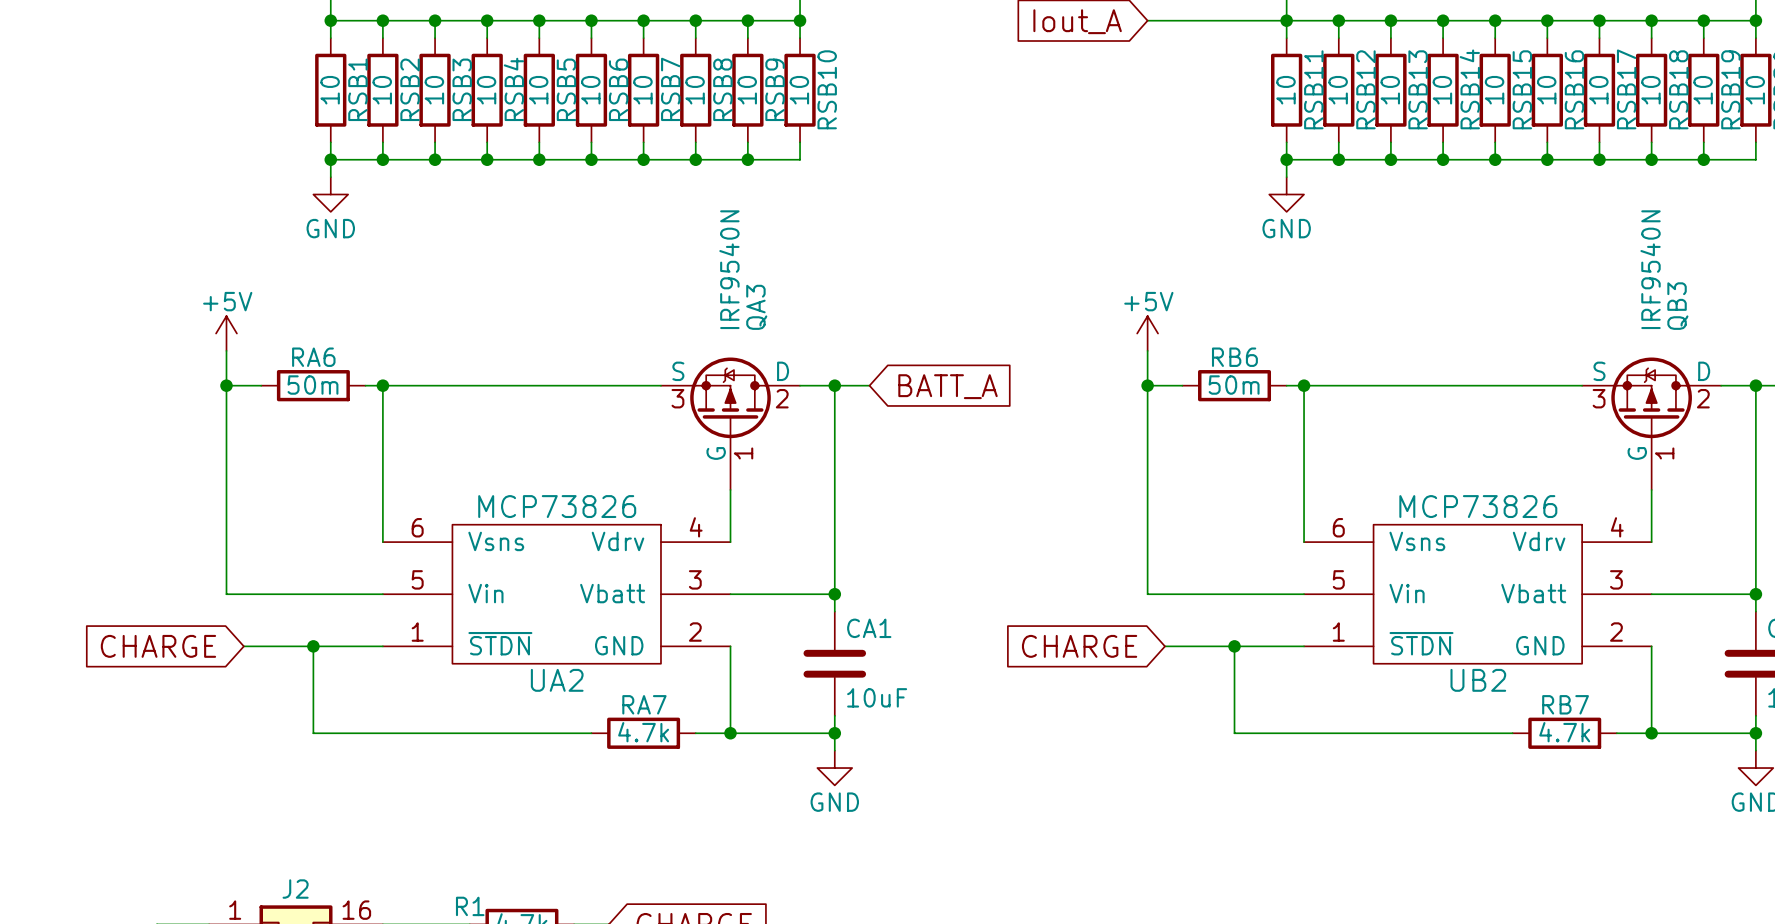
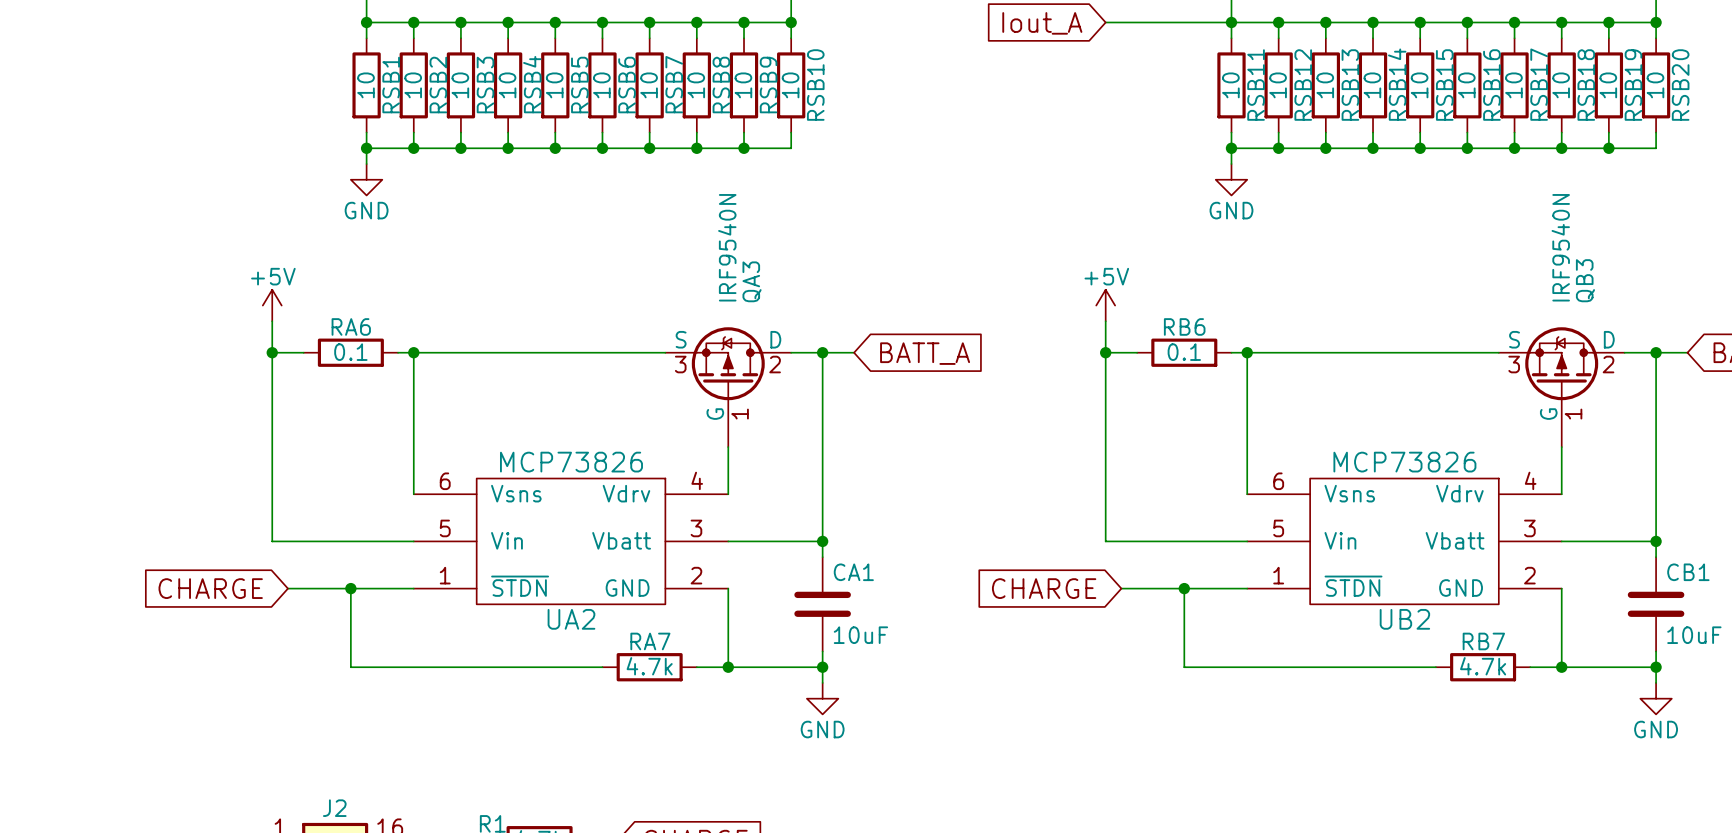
RA6 value: 50m (312, 385) -> 0.1 (350, 352)
RB6 value: 50m (1234, 385) -> 0.1 (1184, 352)

